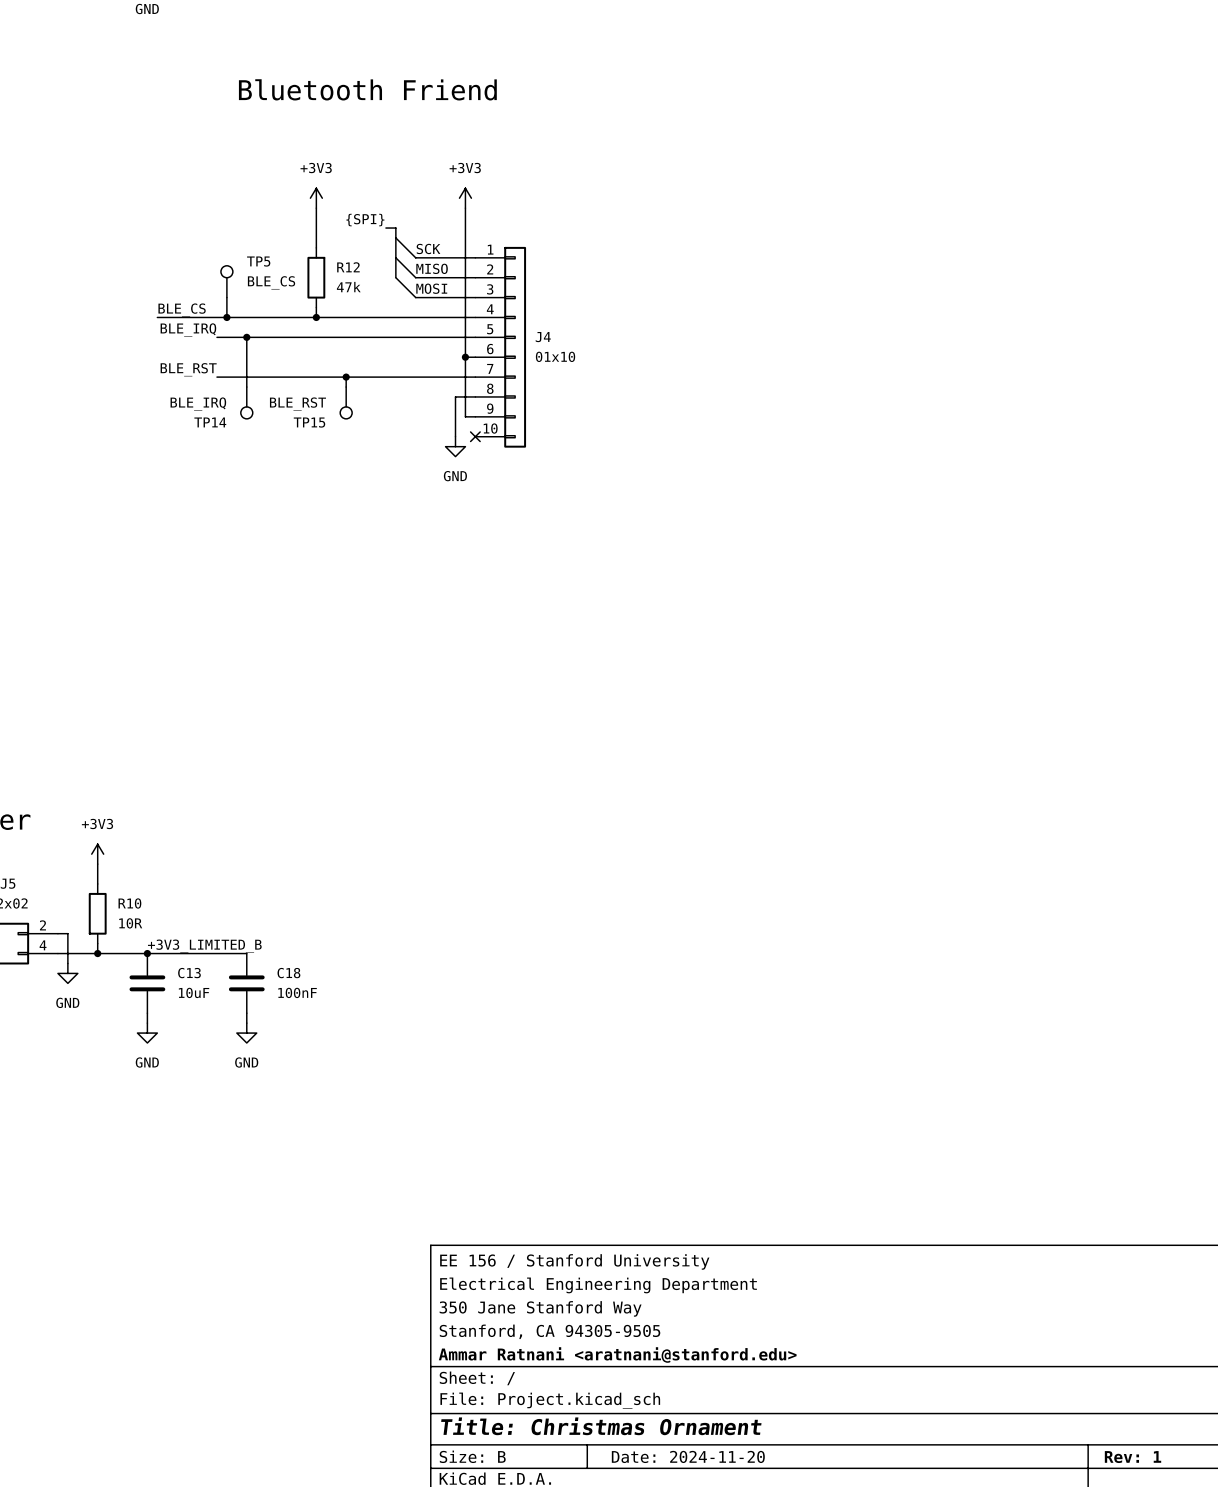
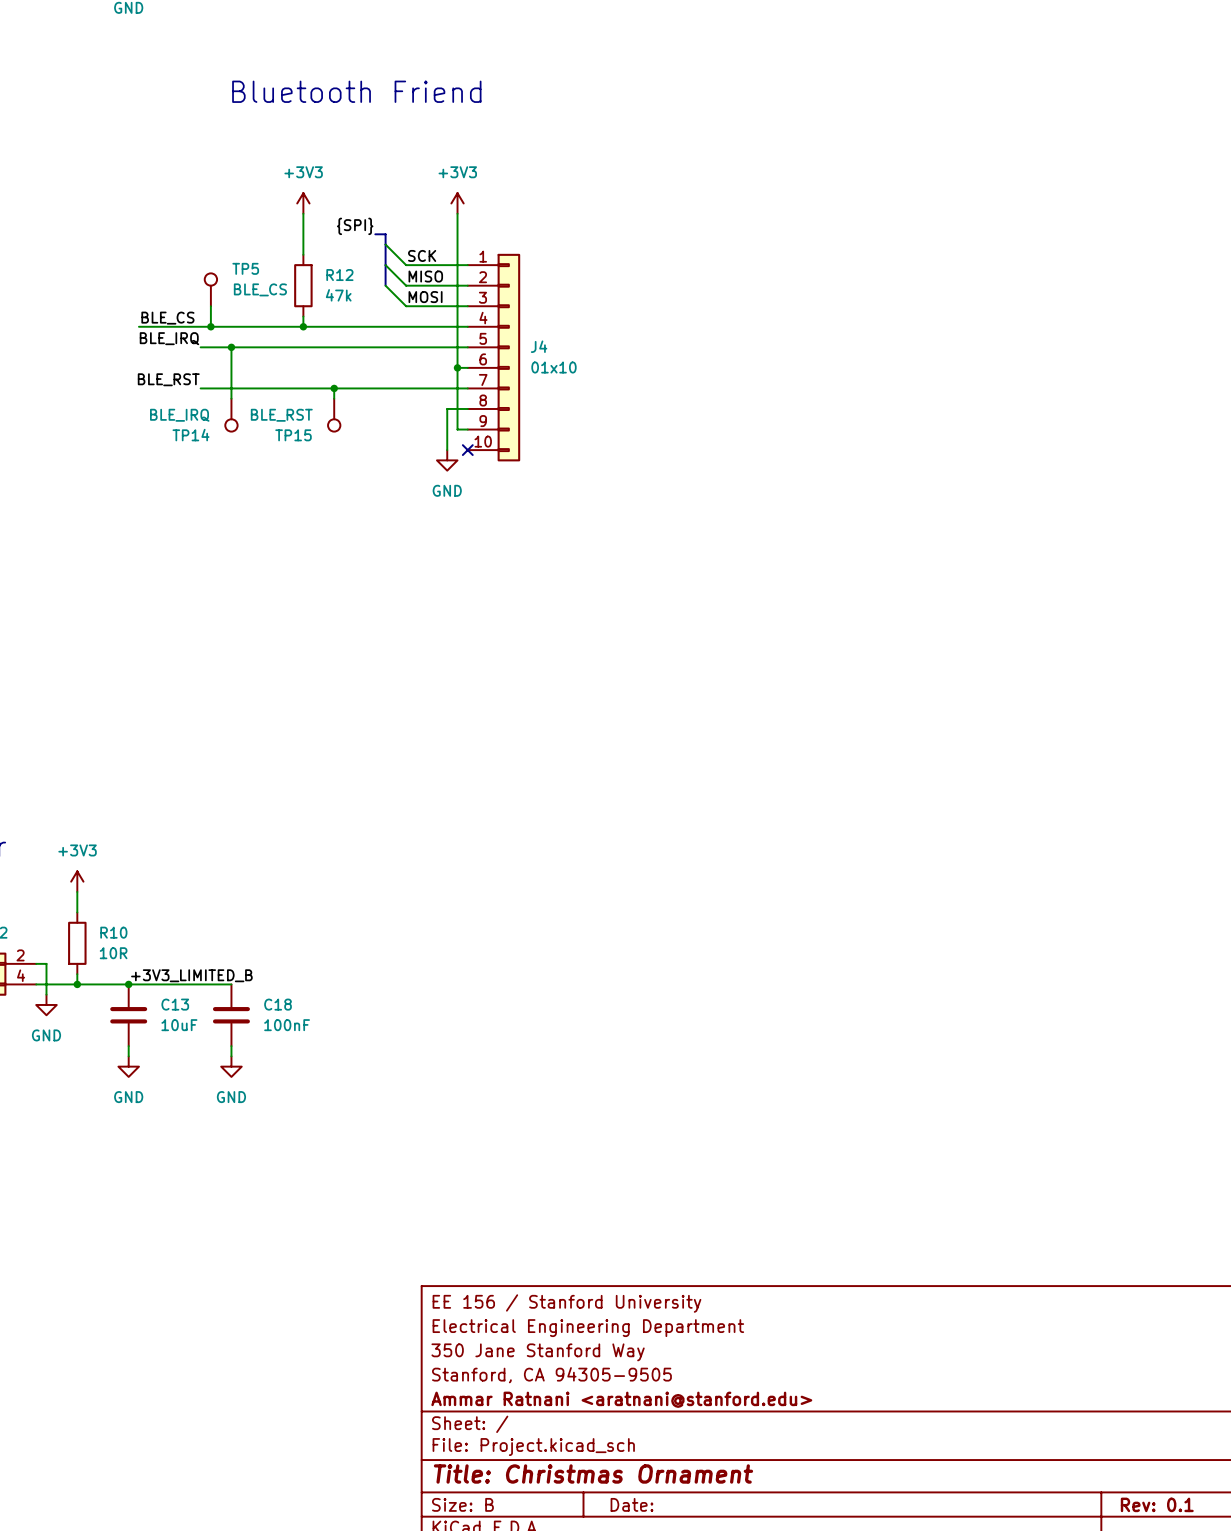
title block: Date: 2024-11-20 (688, 1456) -> Date: (631, 1504)
title block: Rev: 1 (1133, 1457) -> Rev: 0.1 (1157, 1504)

